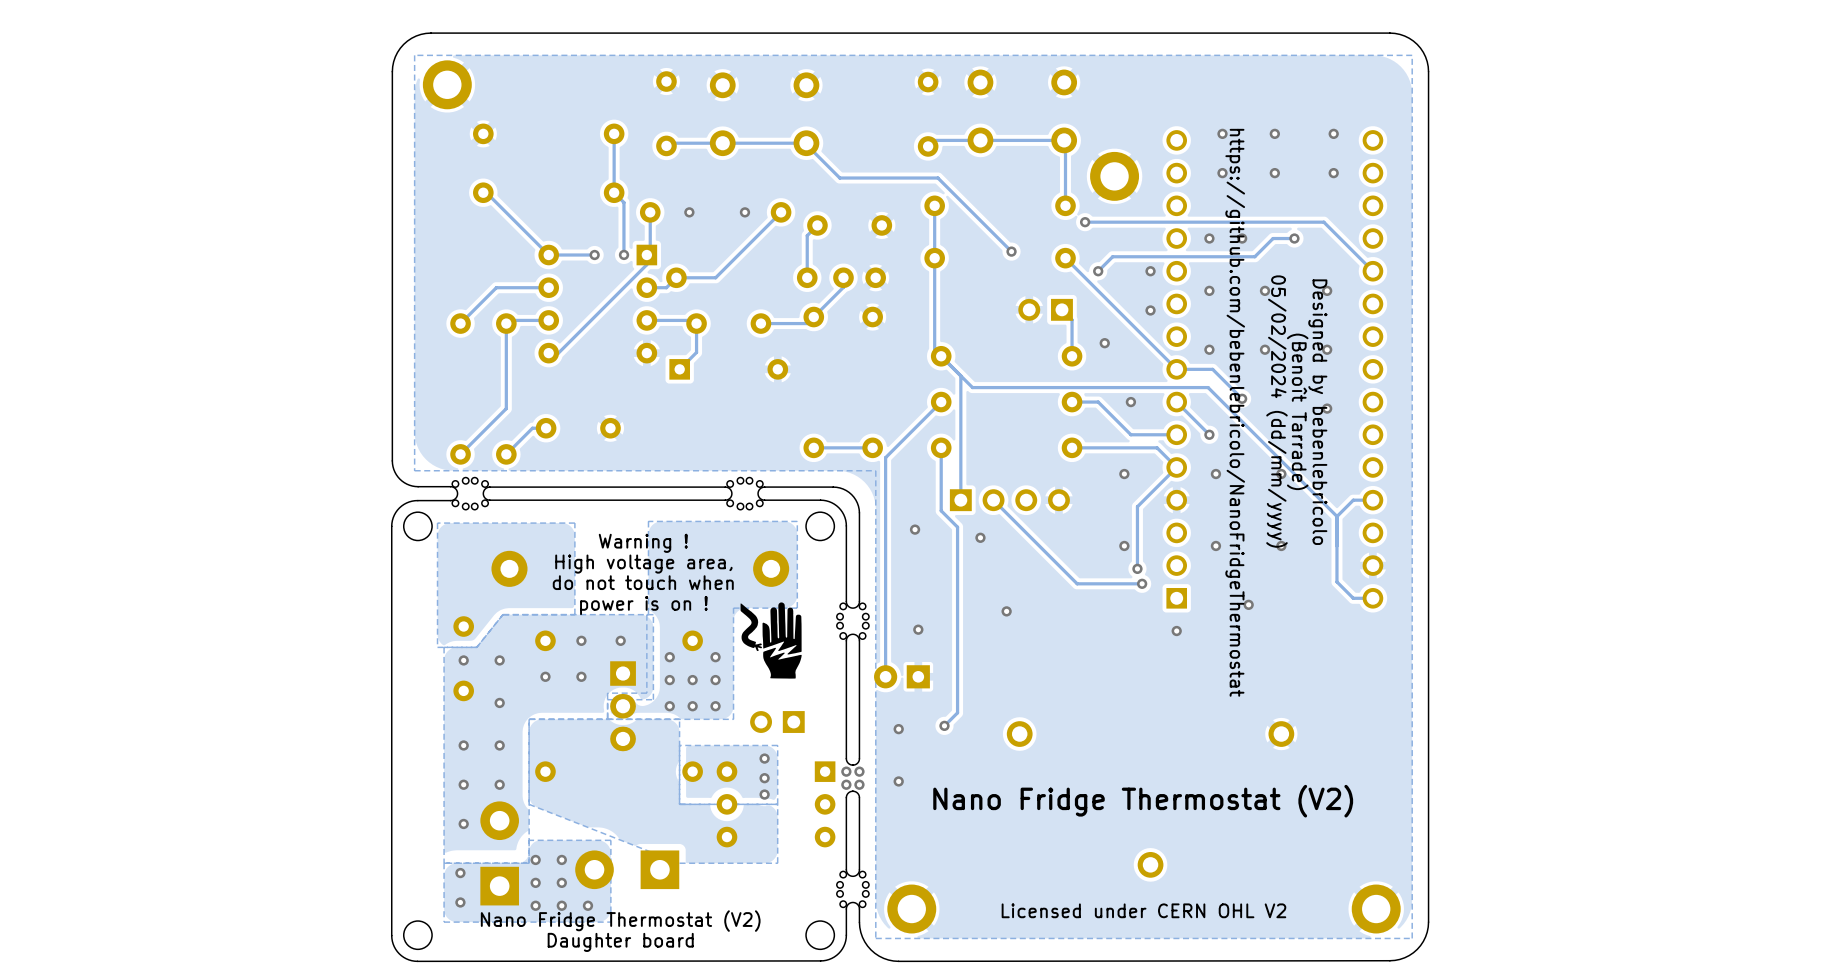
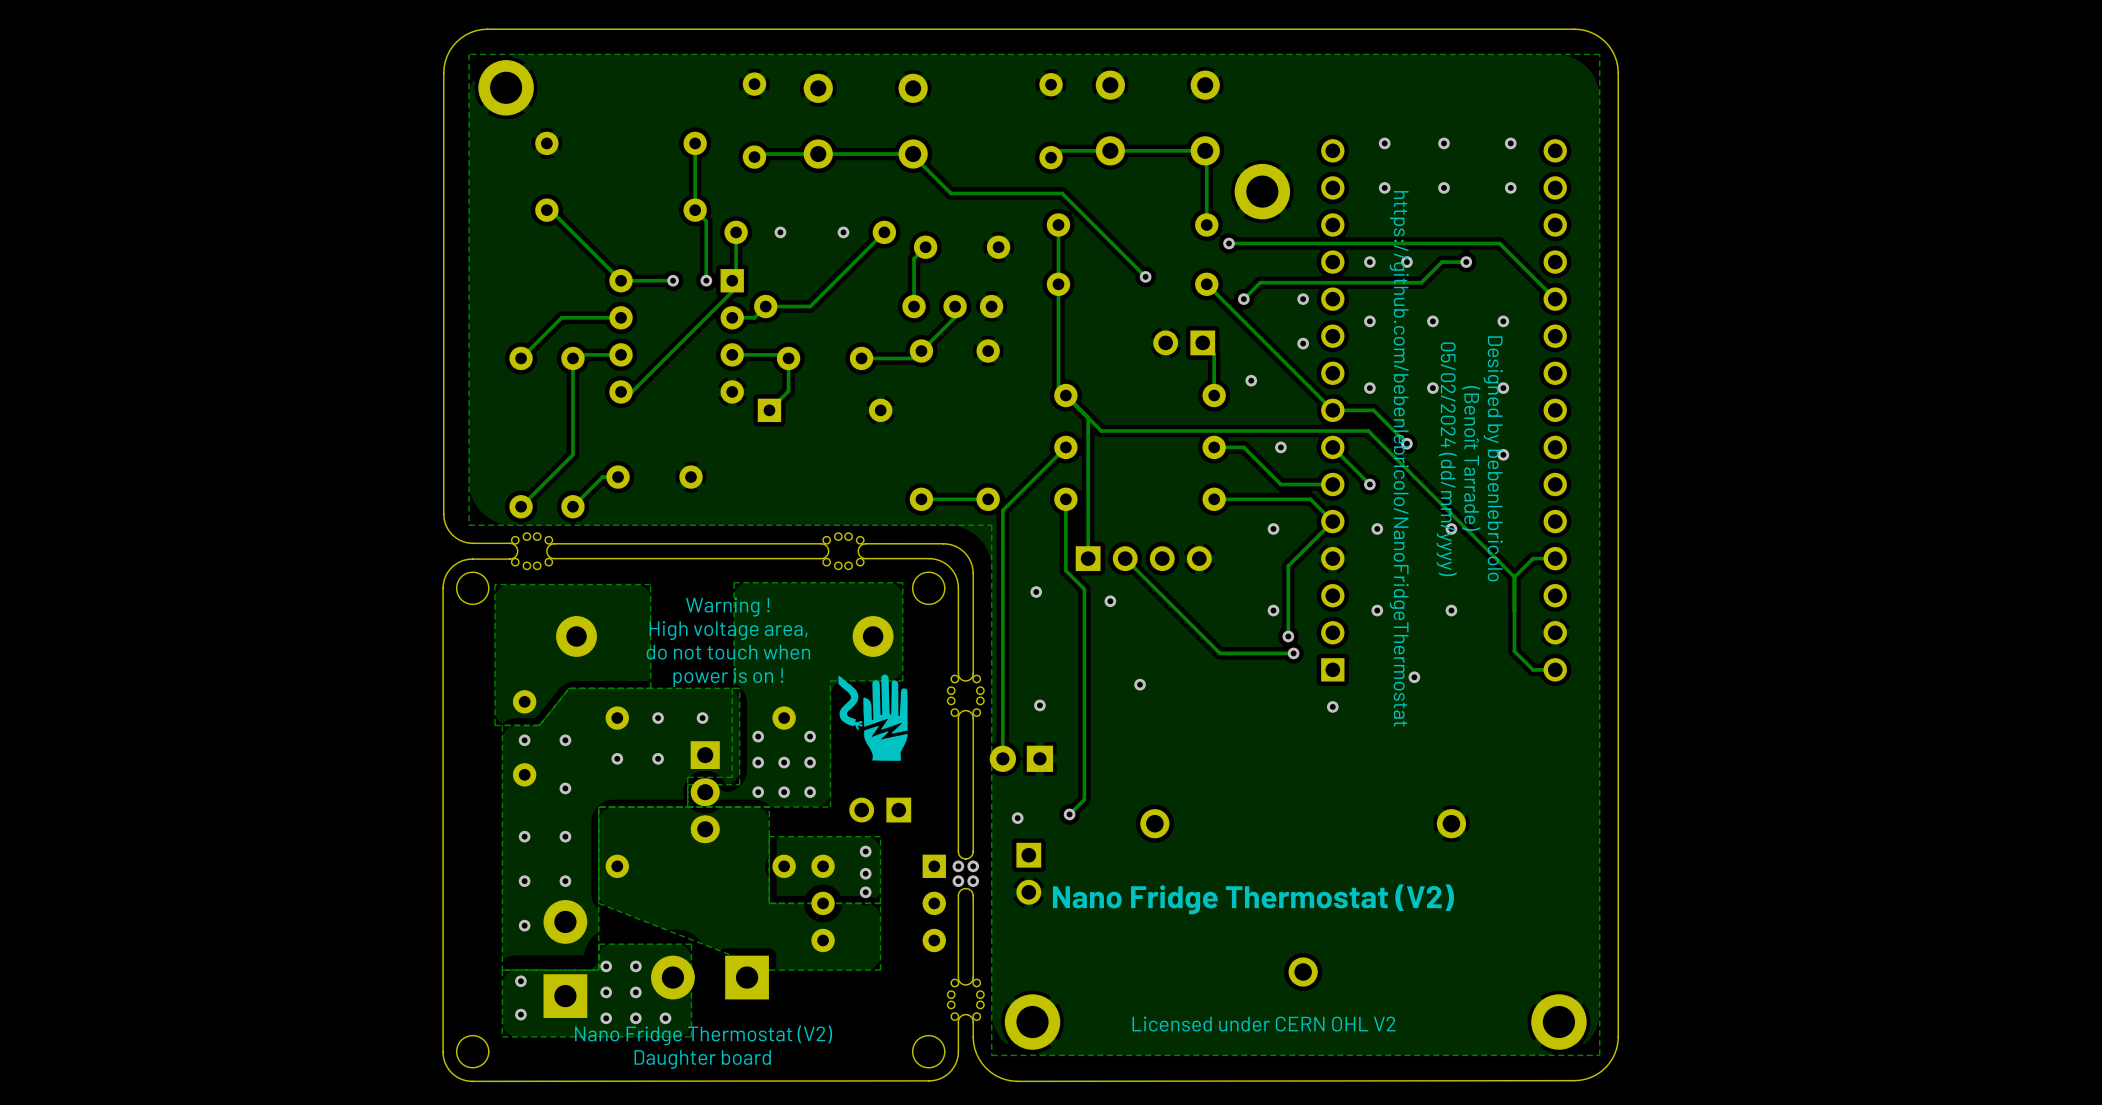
part: none -> (1028, 873)
via: (898, 781) -> none

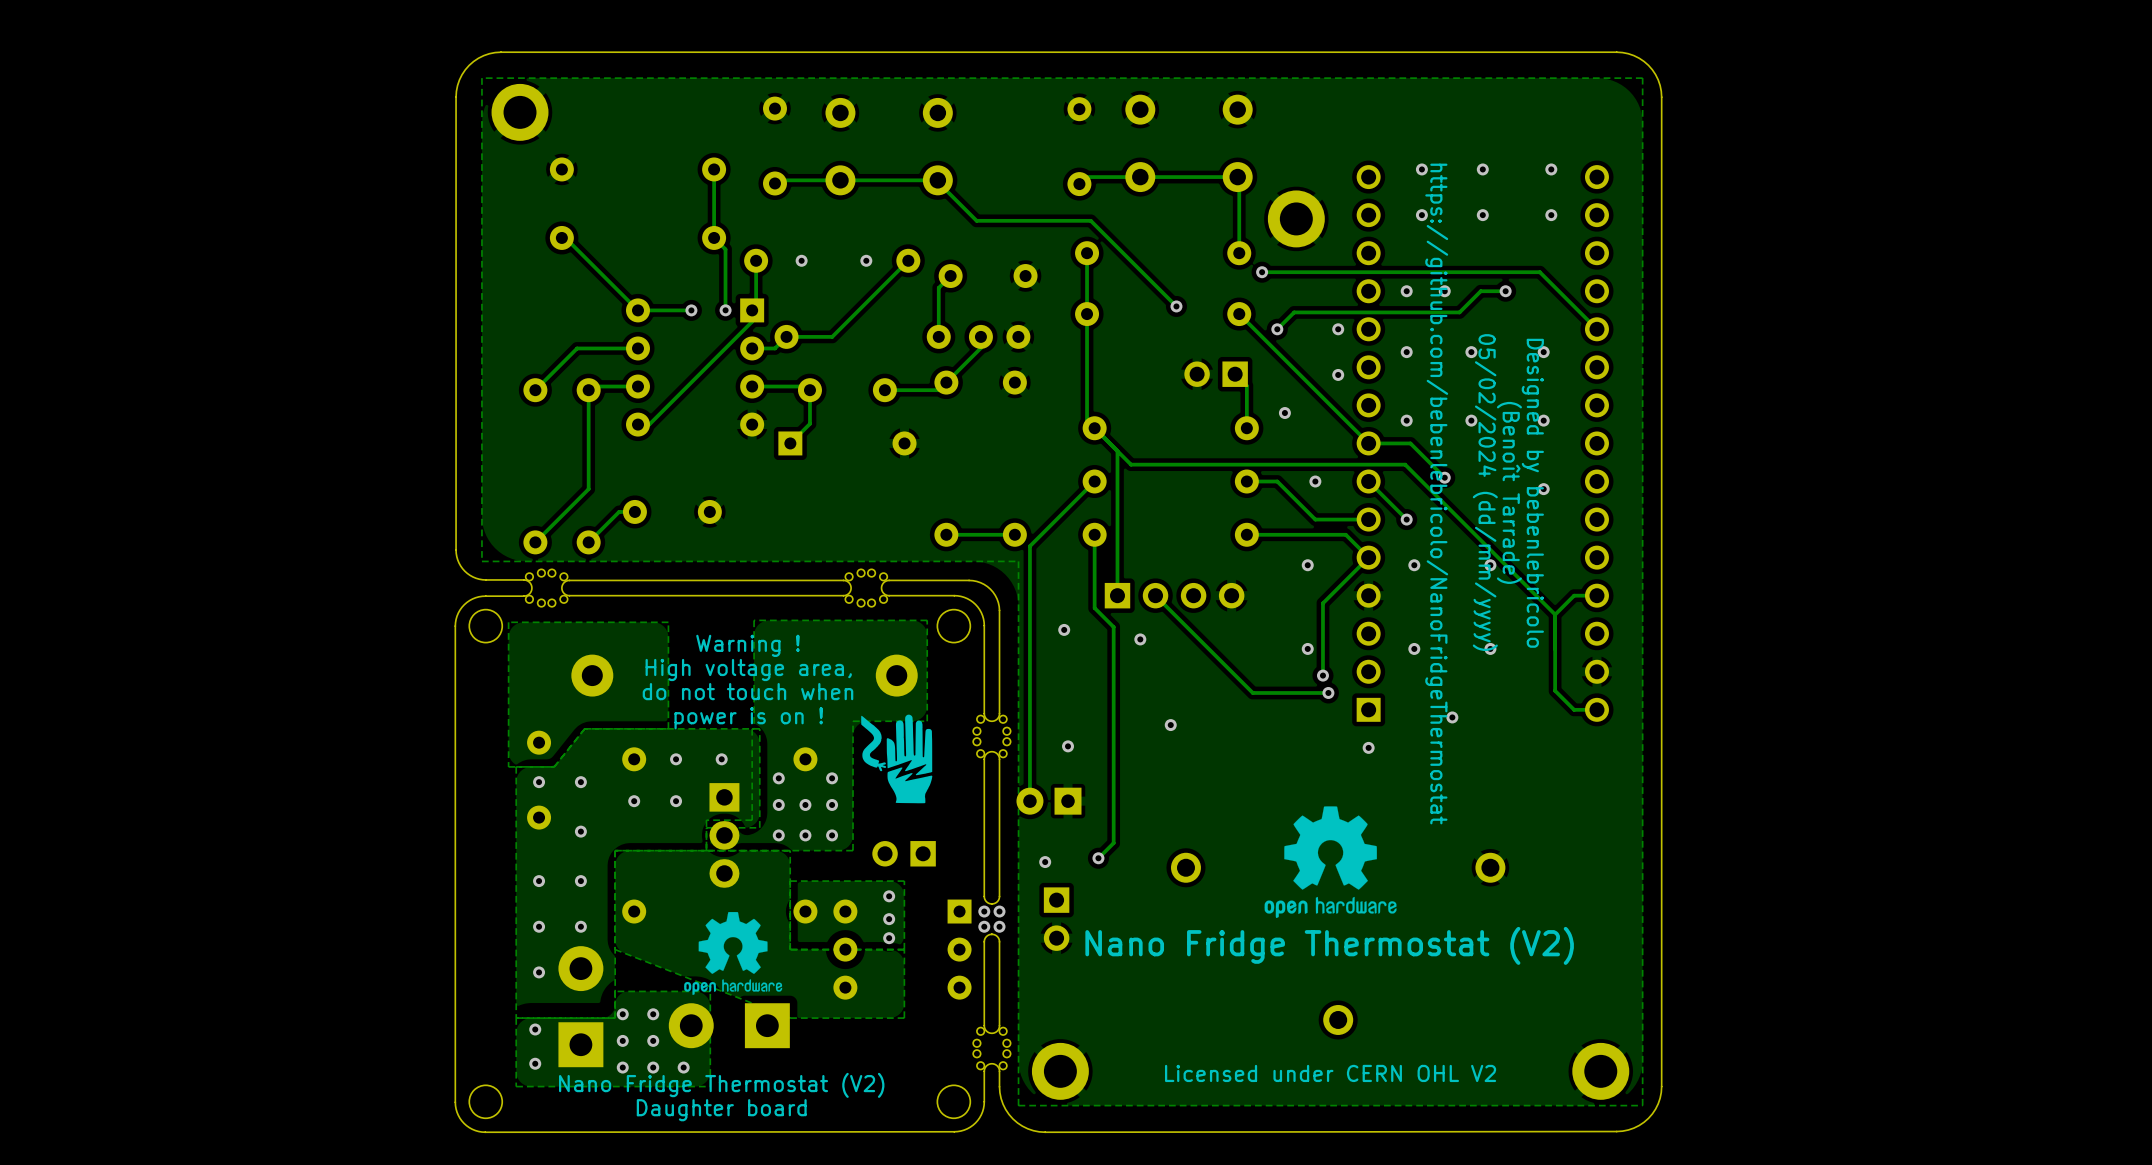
drawing: none -> [1264, 806, 1397, 919]
drawing: none -> [684, 912, 783, 995]

